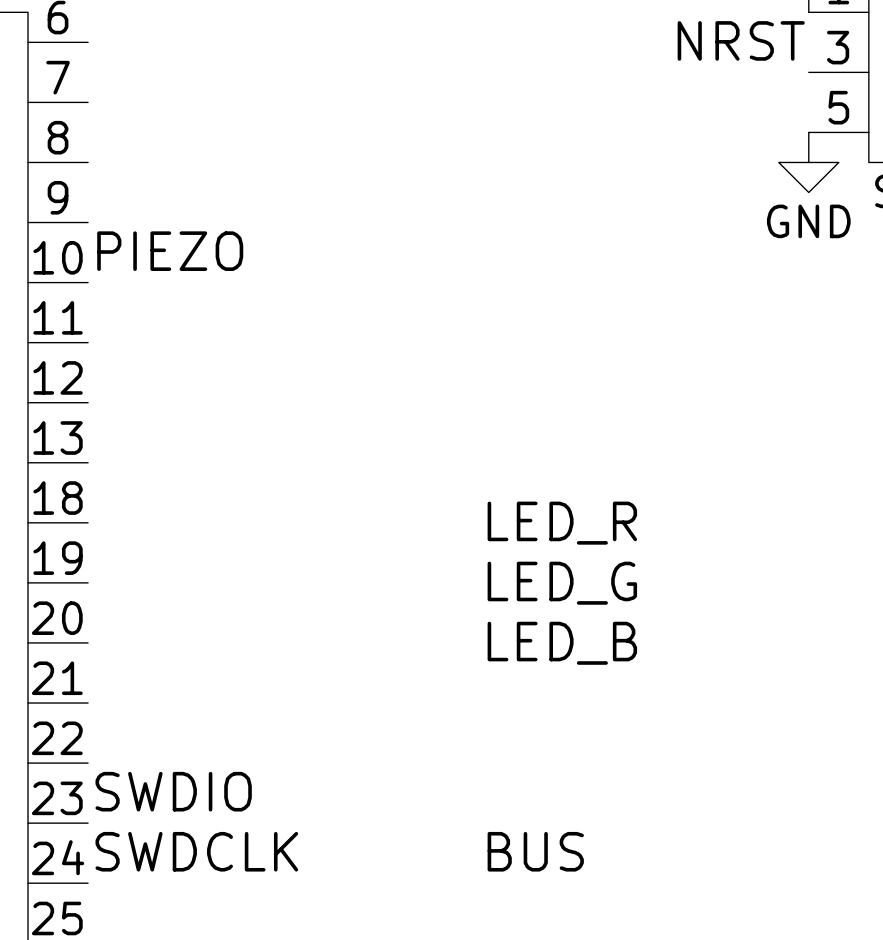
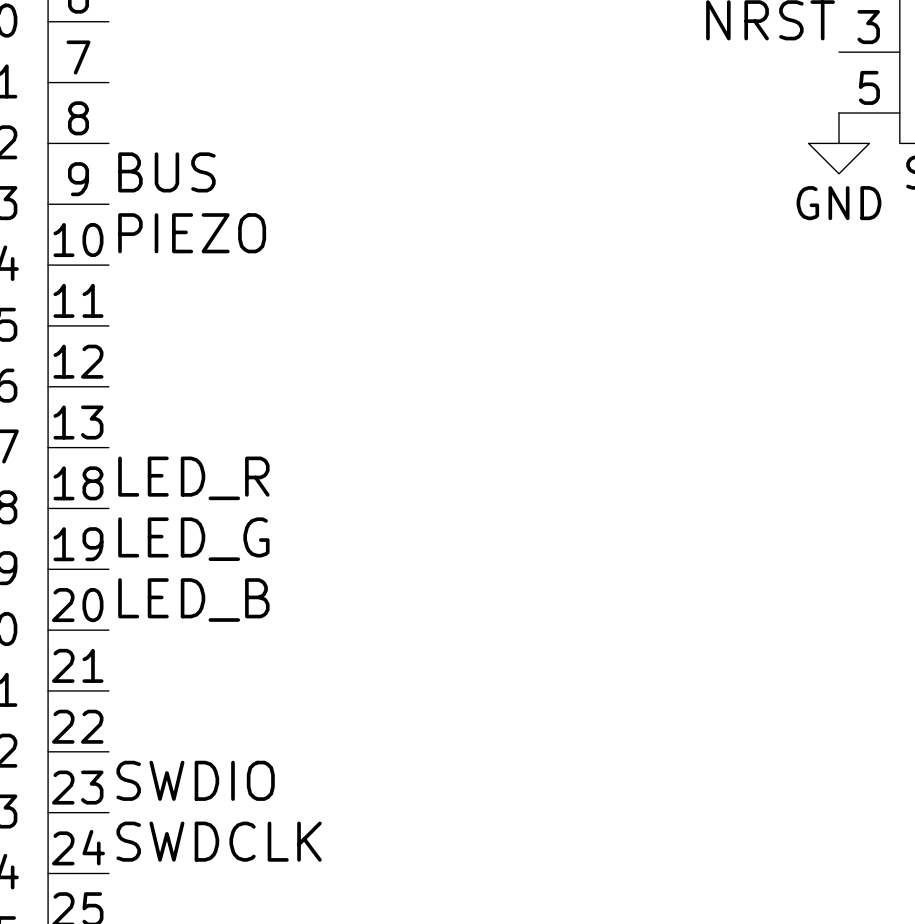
label: none -> BUS (166, 172)
label position: LED_R (562, 523) -> LED_R (193, 478)
label position: LED_G (562, 583) -> LED_G (193, 539)
label position: LED_B (562, 643) -> LED_B (193, 600)
label: BUS (535, 851) -> none

